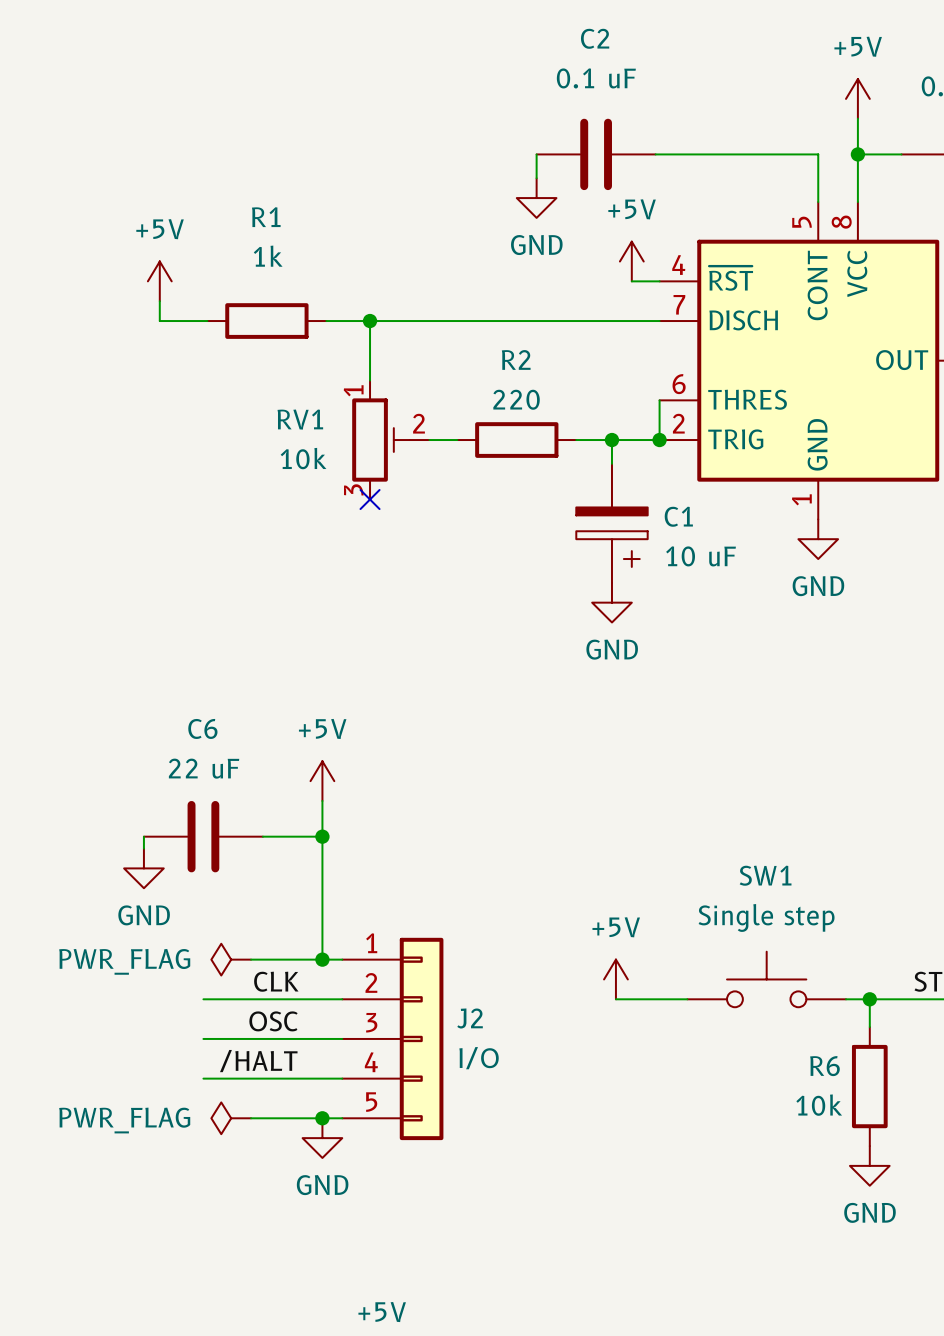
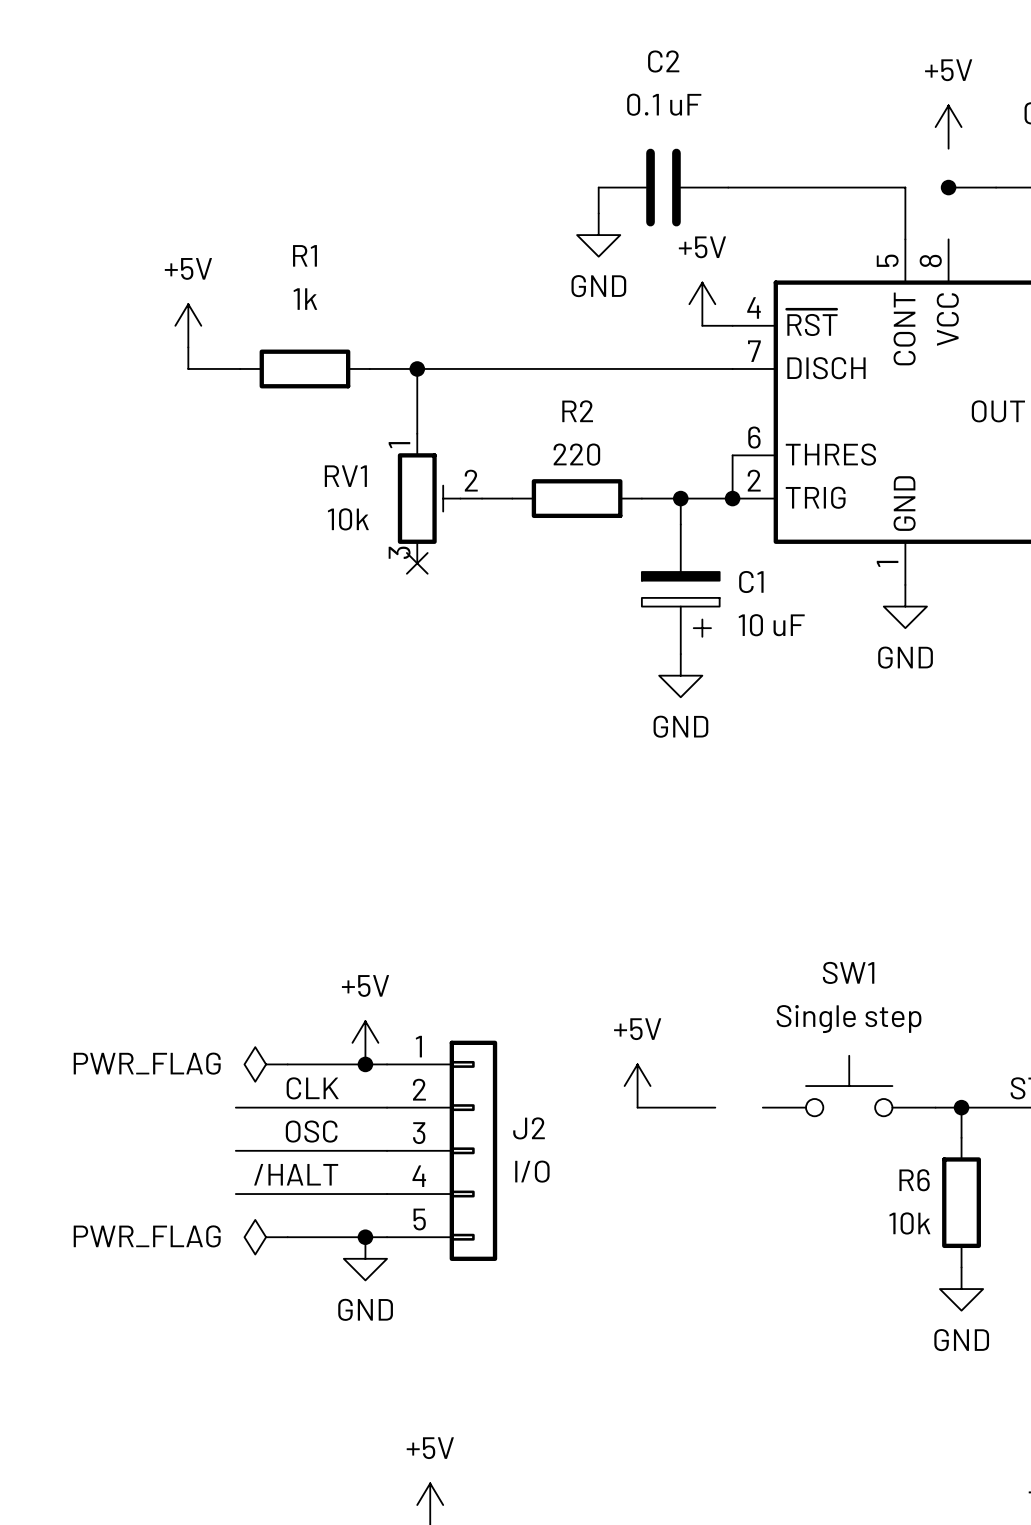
wire: (857, 118) (857, 202) -> none
power symbol: +5V (322, 781) -> none
wire: (322, 800) (322, 959) -> none
wire: (143, 836) (143, 848) -> none
C6: 22 uF (203, 836) -> none
wire: (262, 836) (322, 836) -> none
junction: (322, 836) -> none
power symbol: GND (143, 868) -> none
power symbol: none -> +5V (365, 1042)
power symbol position: +5V (615, 979) -> +5V (637, 1086)
wire: (643, 999) (687, 999) -> (637, 1107) (685, 1107)

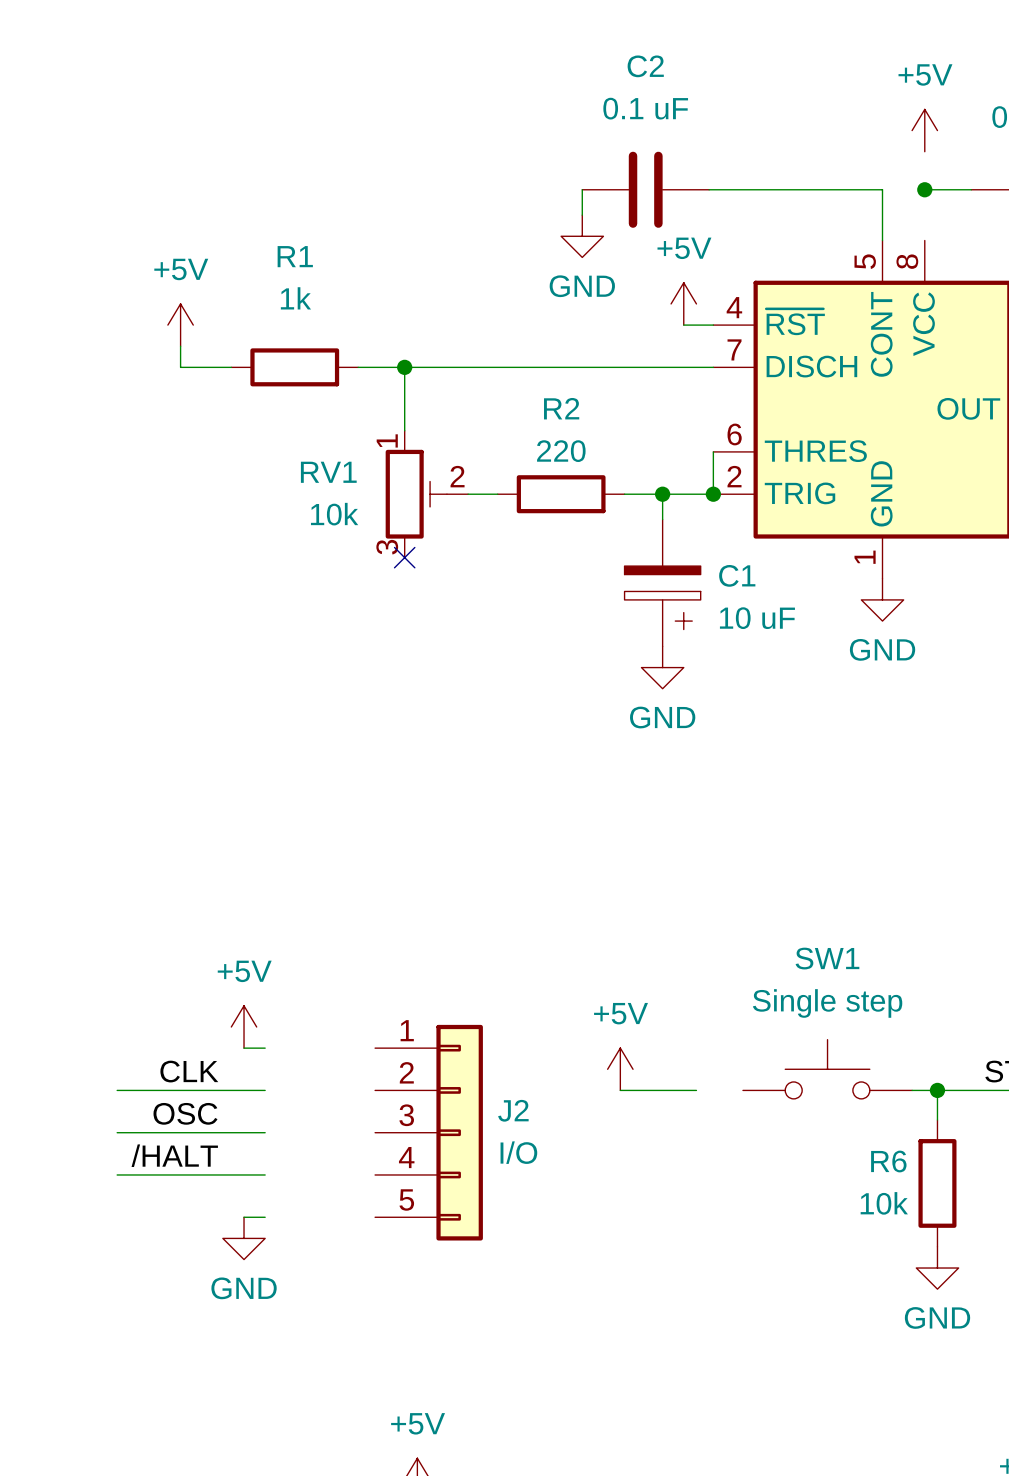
power symbol position: +5V (365, 1042) -> +5V (244, 1026)
wire: none -> (244, 1048) (265, 1048)
power symbol: PWR_FLAG (266, 1064) -> none
wire: (287, 1064) (387, 1064) -> none
junction: (365, 1064) -> none
label position: CLK (312, 1088) -> CLK (189, 1071)
wire: (274, 1107) (387, 1107) -> (117, 1090) (227, 1090)
label position: OSC (311, 1131) -> OSC (185, 1113)
wire: (274, 1150) (387, 1150) -> (117, 1132) (227, 1132)
label position: /HALT (296, 1174) -> /HALT (174, 1155)
wire: (274, 1194) (387, 1194) -> (117, 1174) (227, 1174)
wire: none -> (244, 1217) (265, 1217)
power symbol: PWR_FLAG (266, 1237) -> none
wire: (287, 1237) (387, 1237) -> none
junction: (365, 1237) -> none
power symbol position: GND (365, 1258) -> GND (244, 1238)

